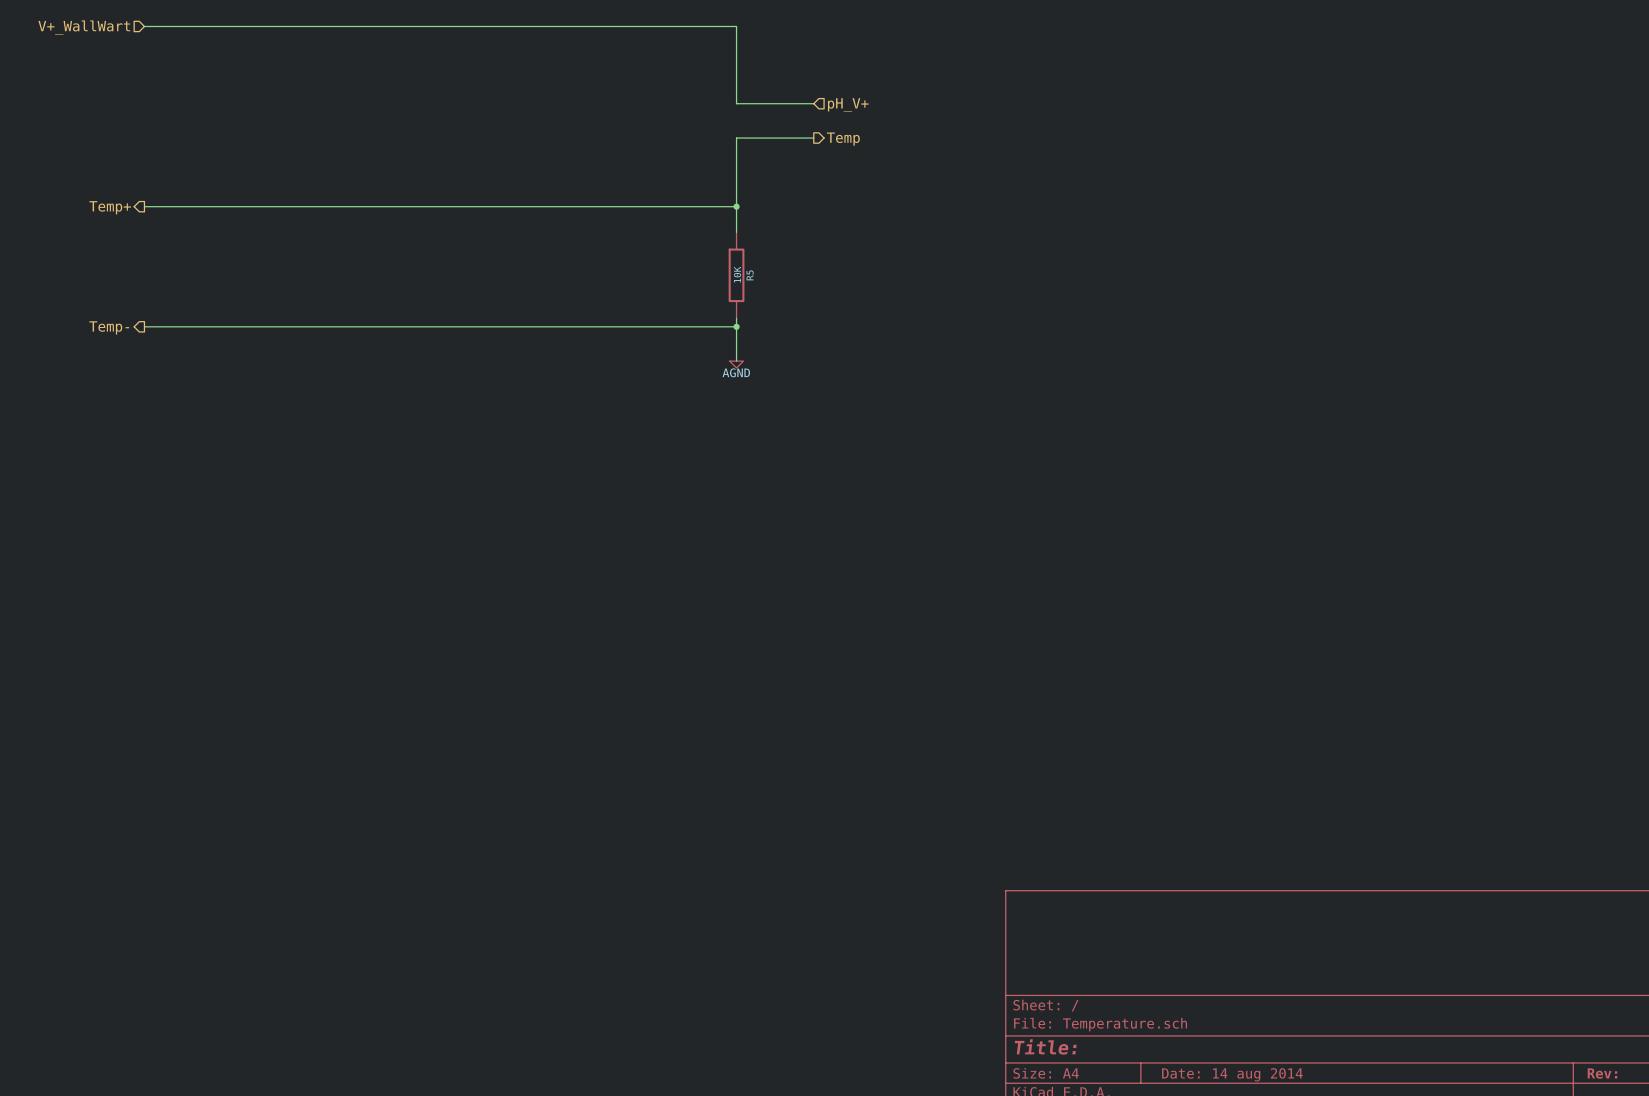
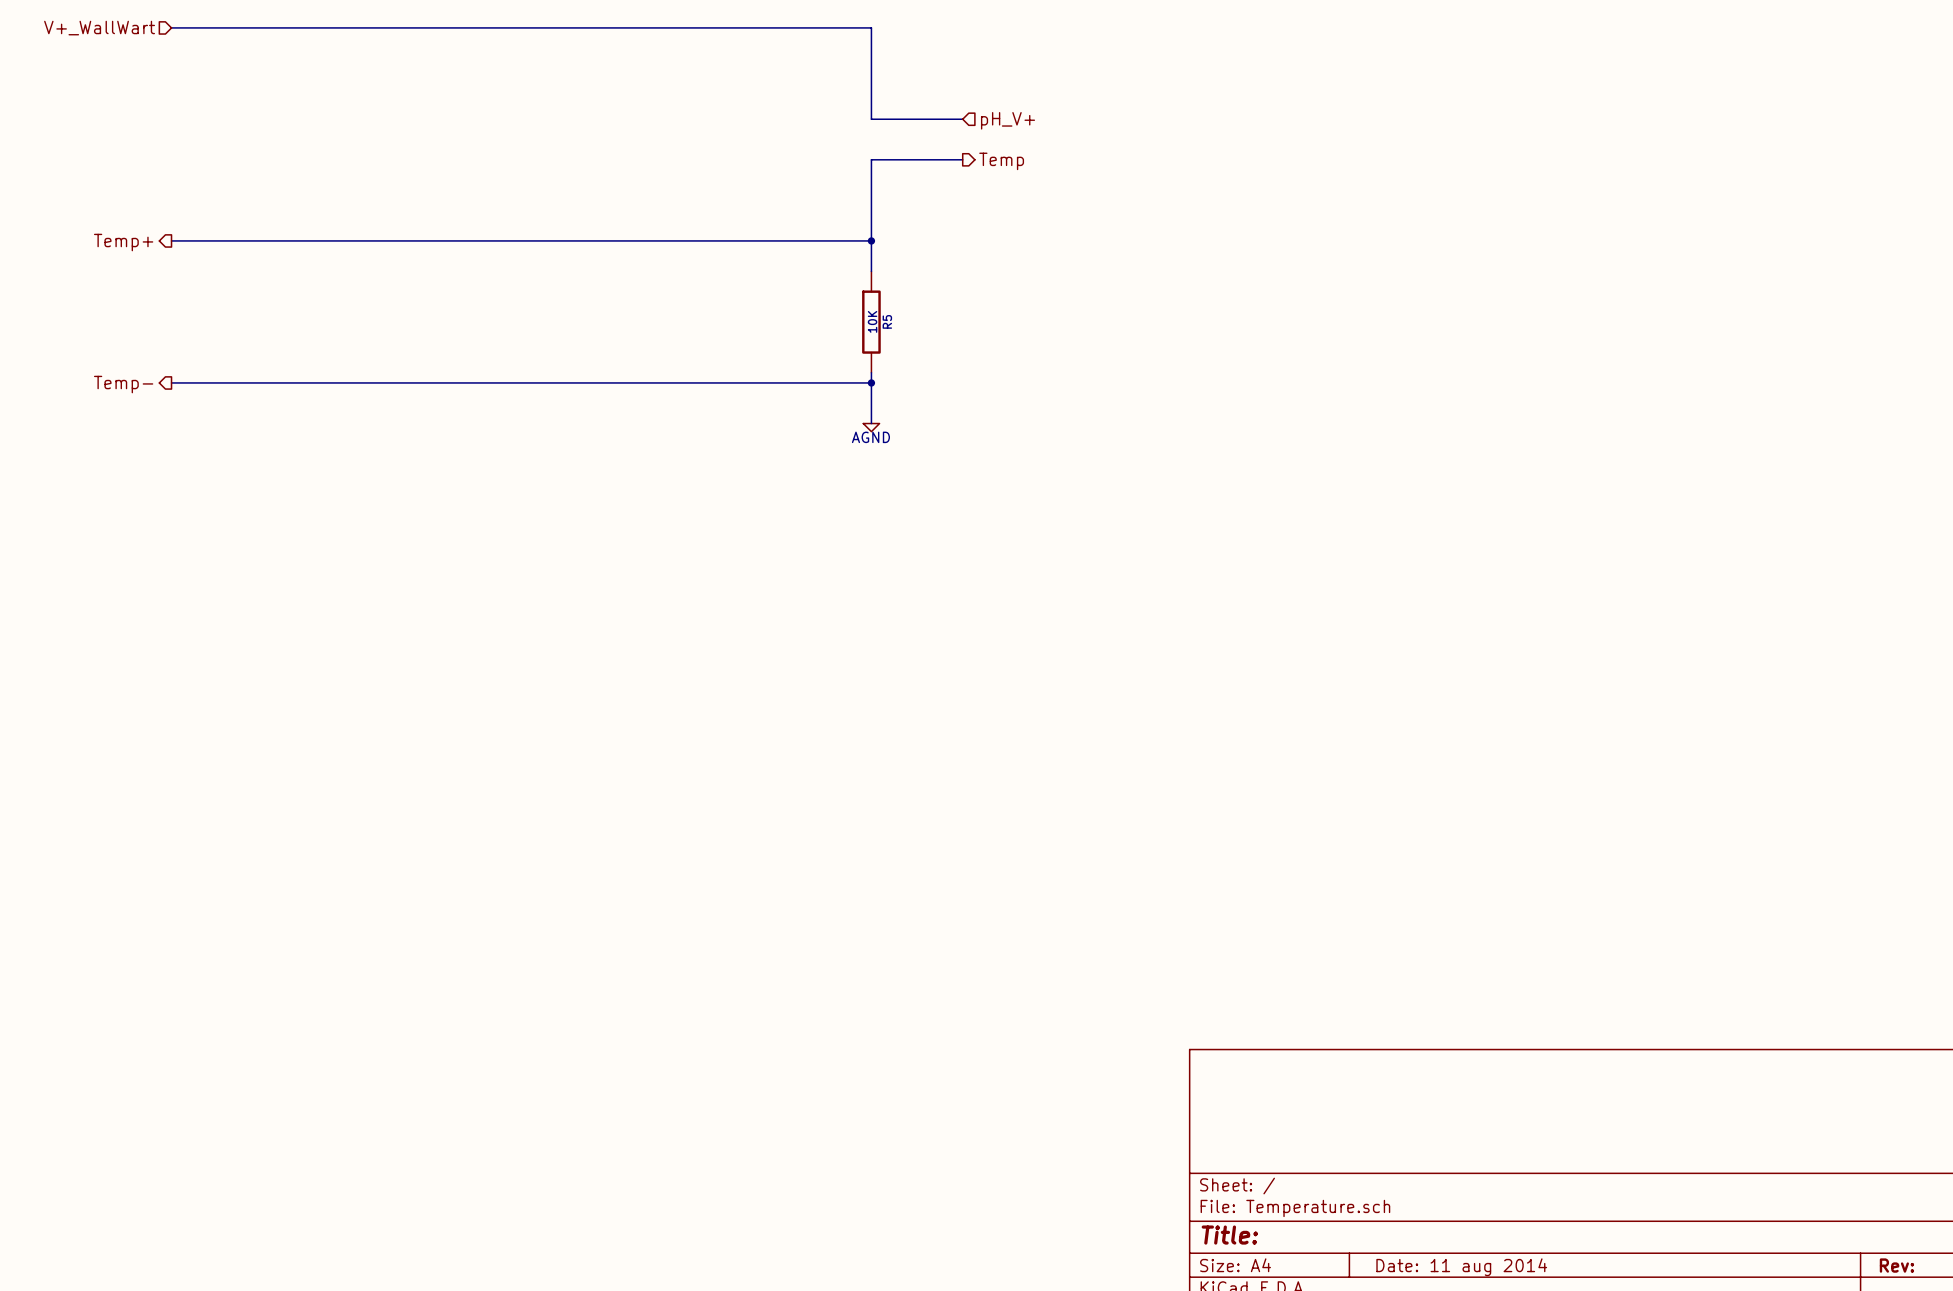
title block: Date: 14 aug 2014 (1232, 1074) -> Date: 11 aug 2014 (1461, 1267)

